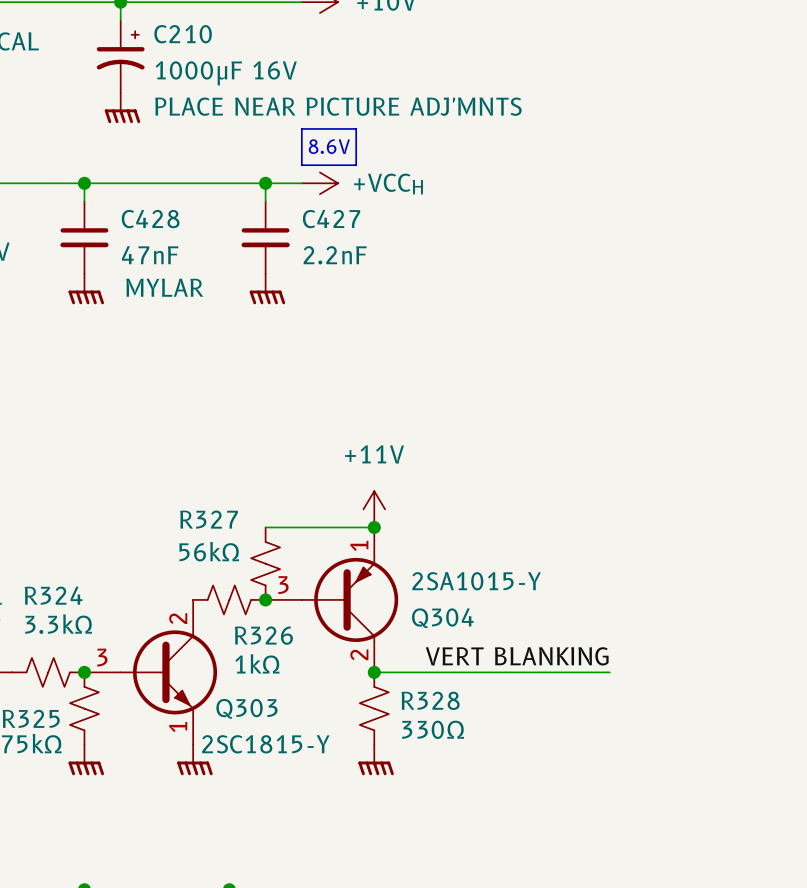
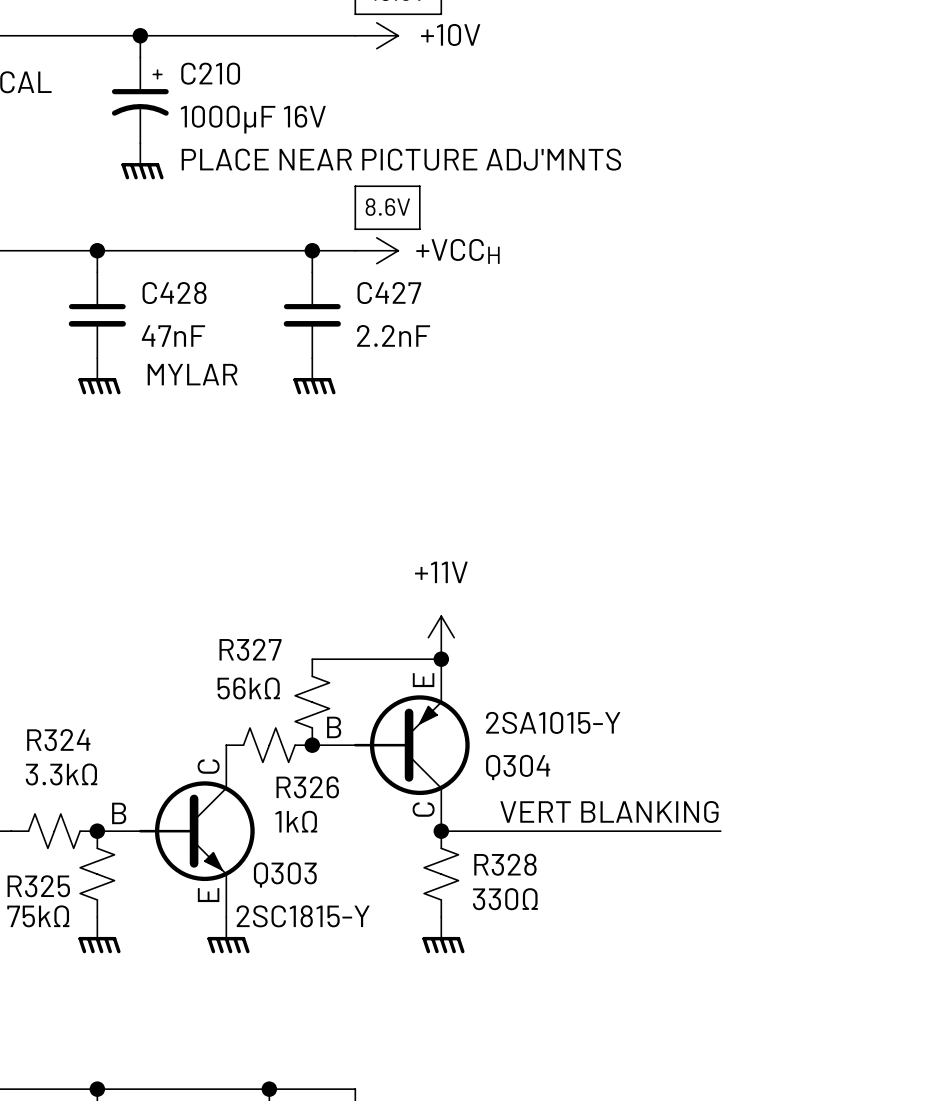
Q304 symbol: [265, 527, 399, 673] -> [312, 659, 470, 832]
Q303 symbol: [84, 599, 218, 745] -> [97, 745, 255, 918]

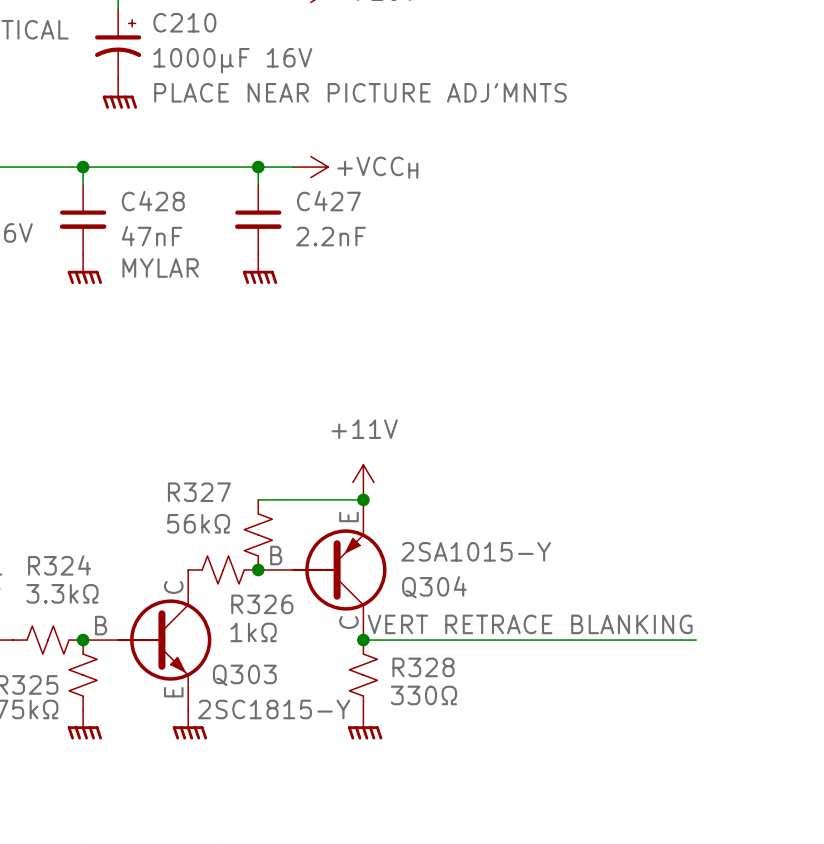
line: (355, 186) (419, 186) (419, 229) (355, 229) (355, 186) -> none
text: 8.6V (387, 207) -> none
label: VERT BLANKING (609, 811) -> VERT RETRACE BLANKING (530, 624)
wire: none -> (591, 640) (696, 640)

